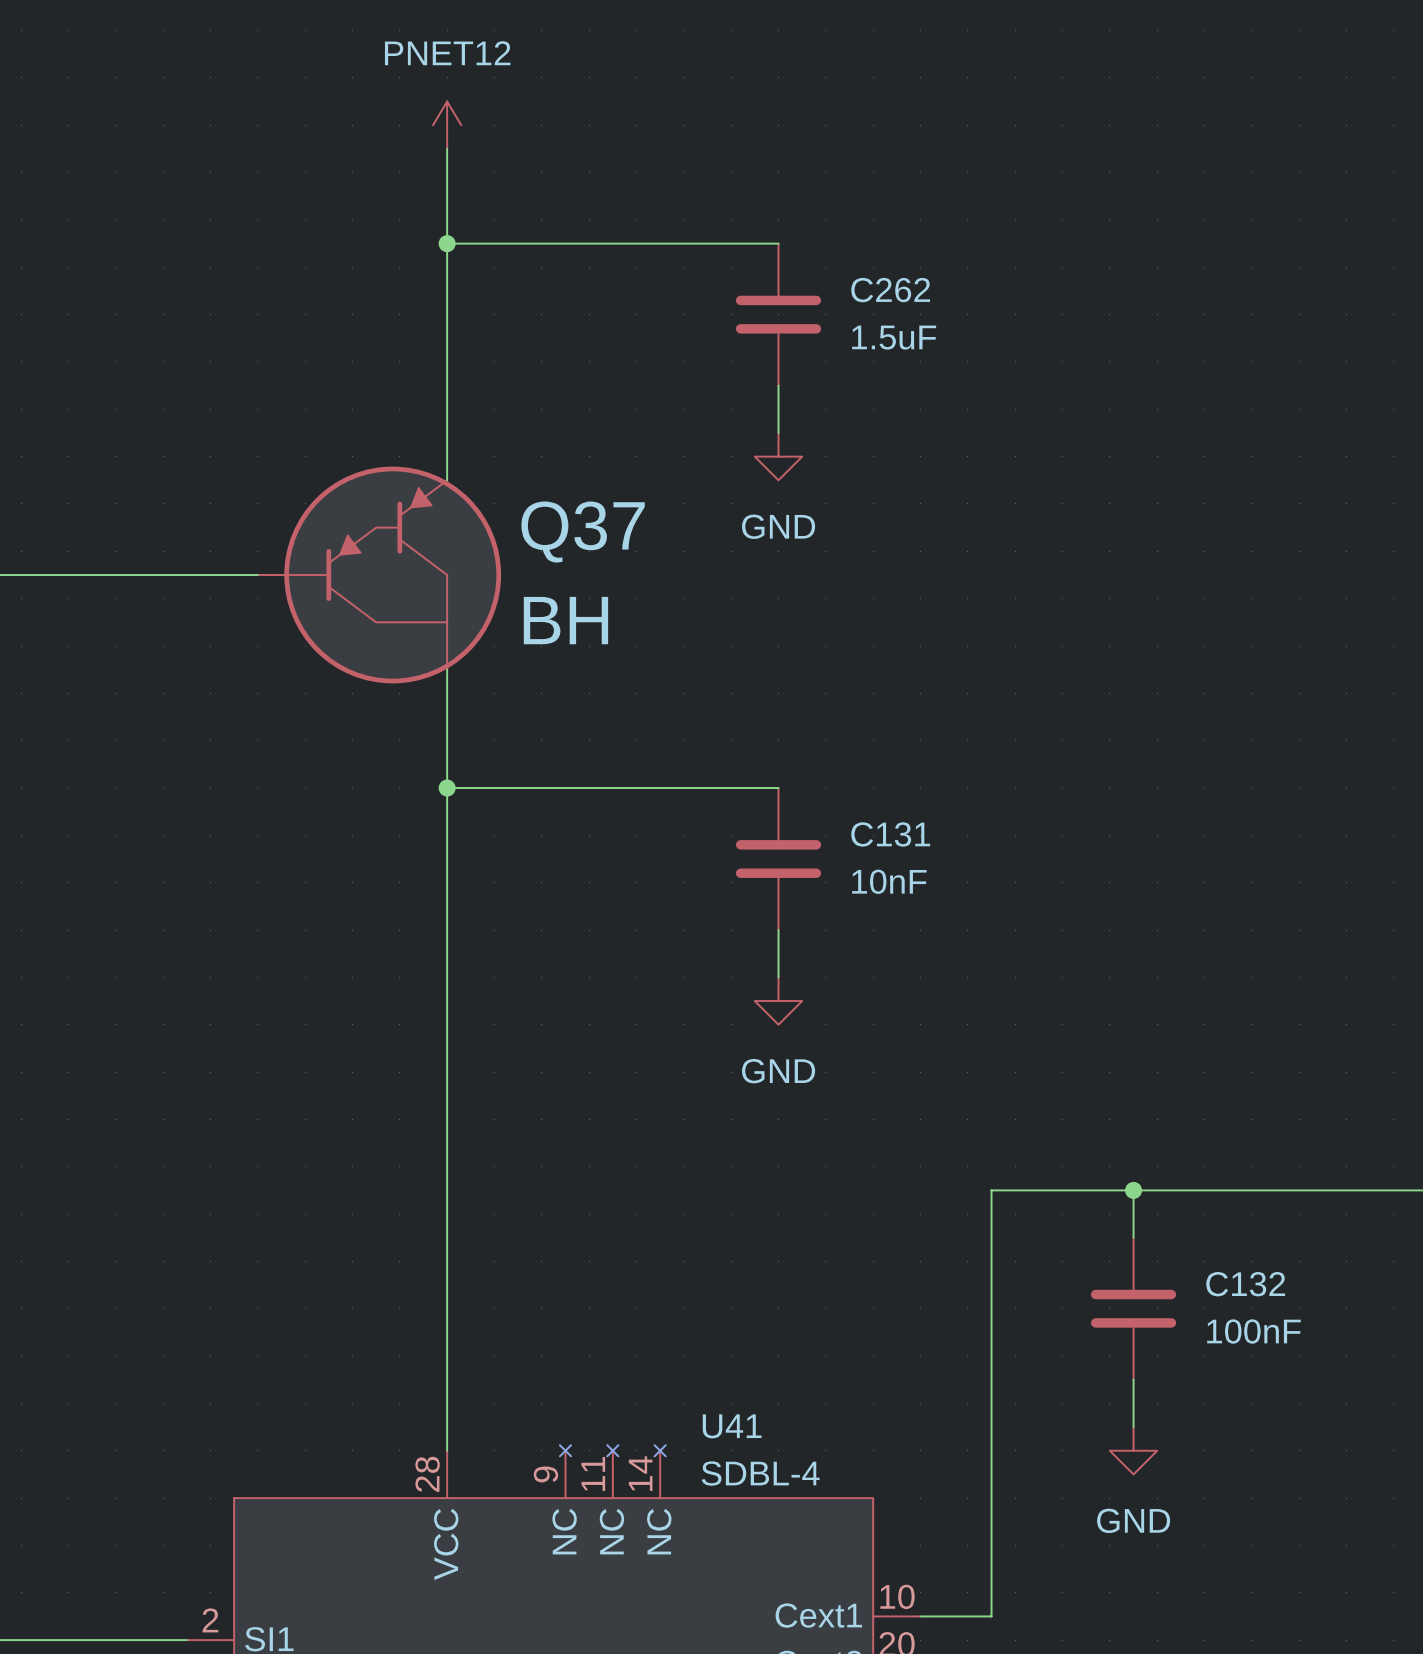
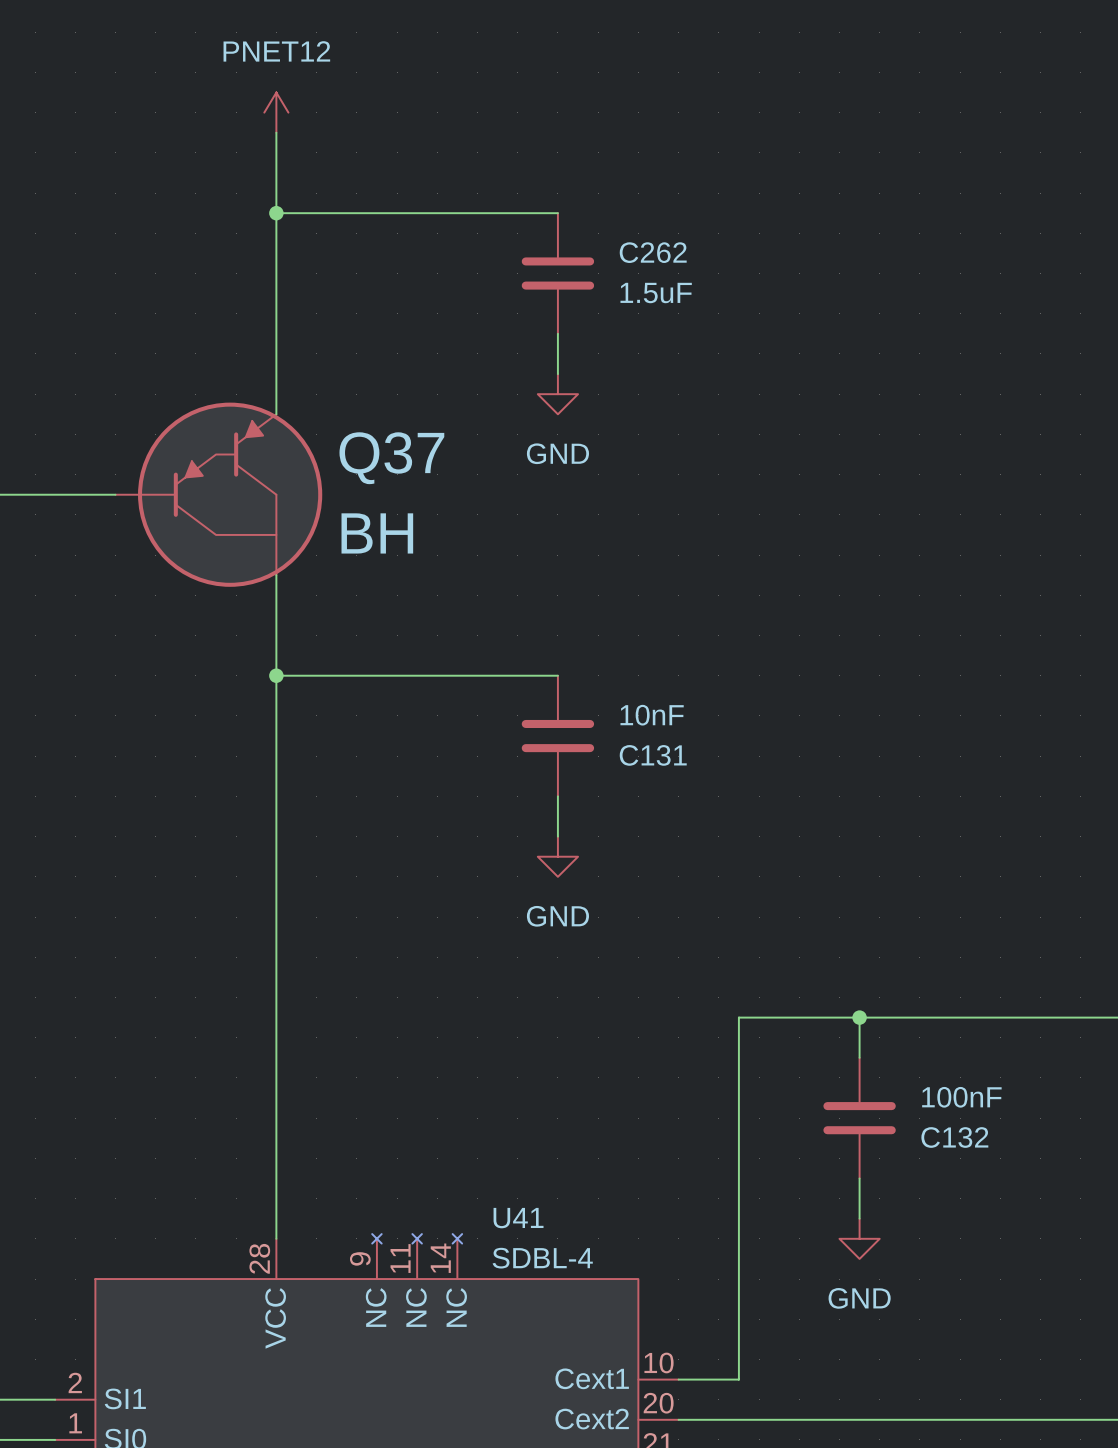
C131 name position: C131 (890, 834) -> C131 (653, 755)
C131 value position: 10nF (889, 881) -> 10nF (652, 715)
C132 name position: C132 (1245, 1284) -> C132 (954, 1137)
C132 value position: 100nF (1253, 1331) -> 100nF (961, 1097)

